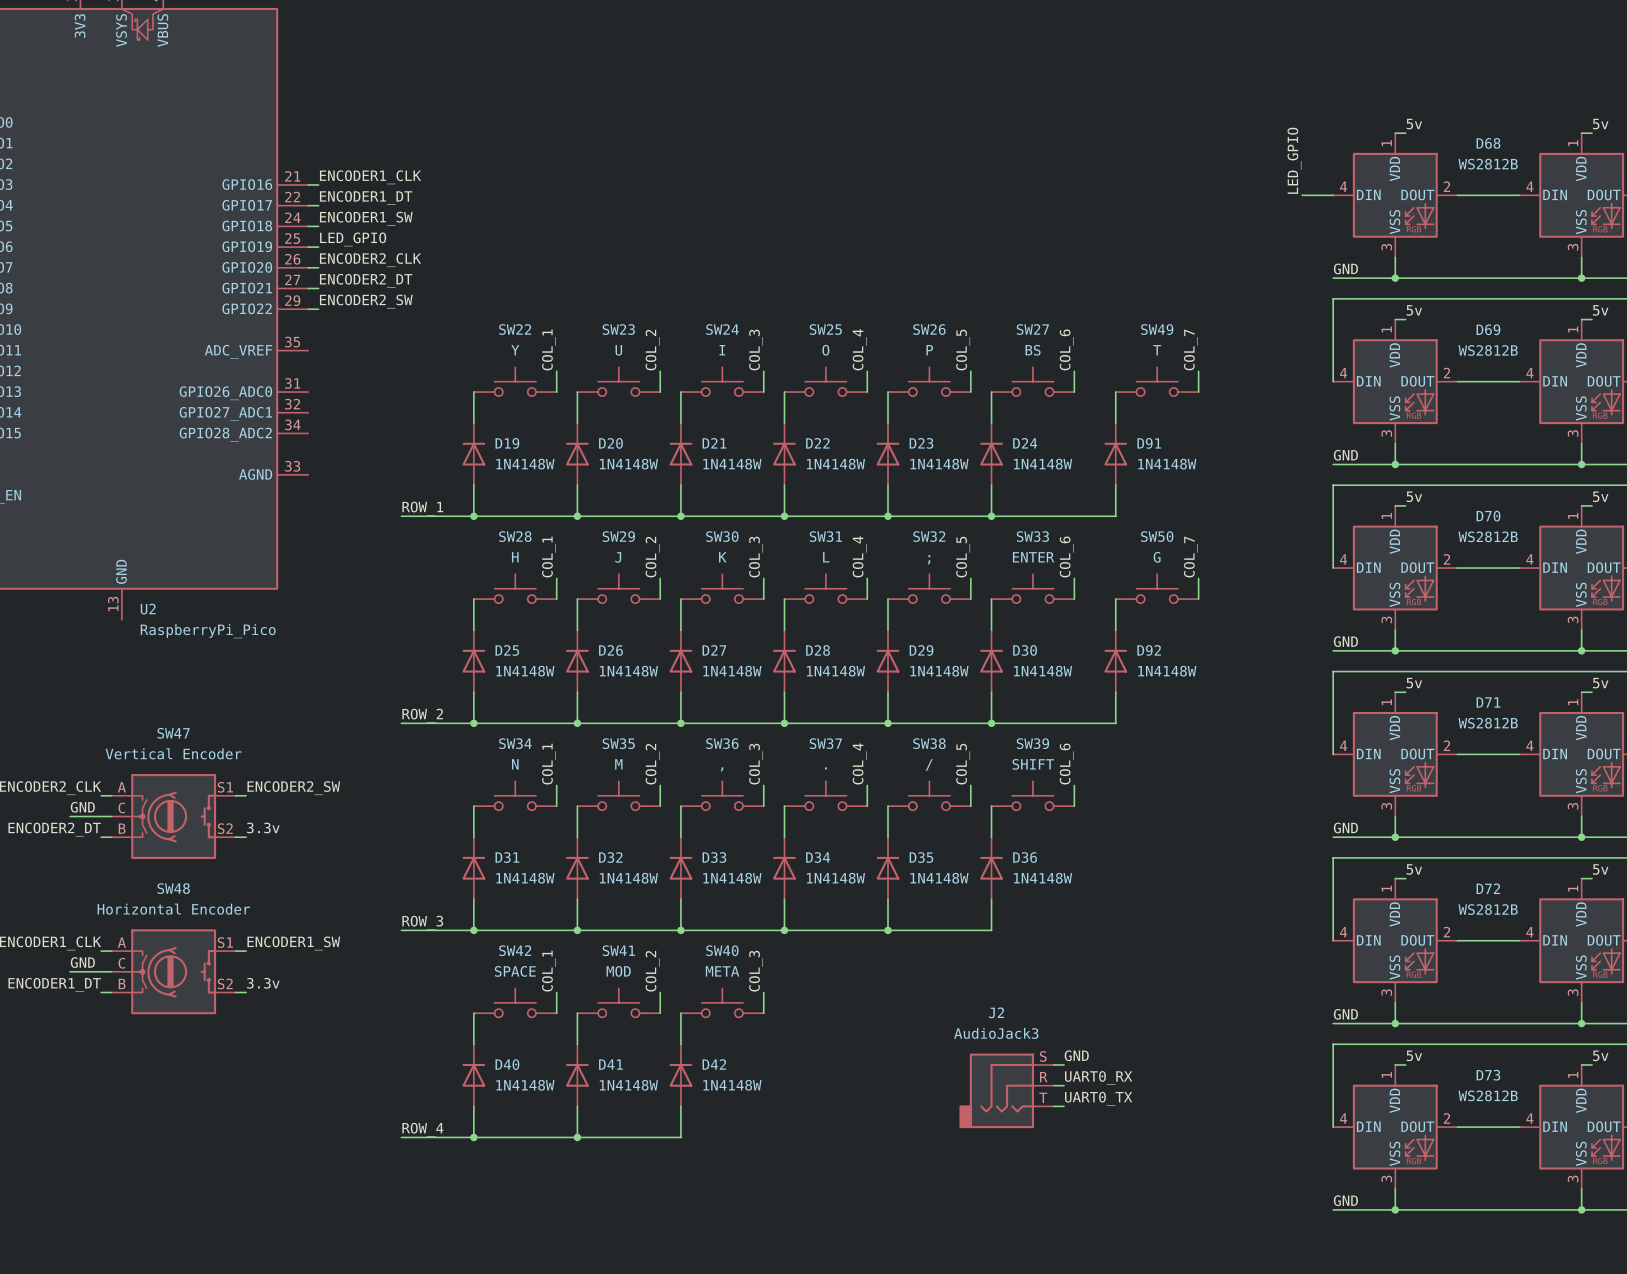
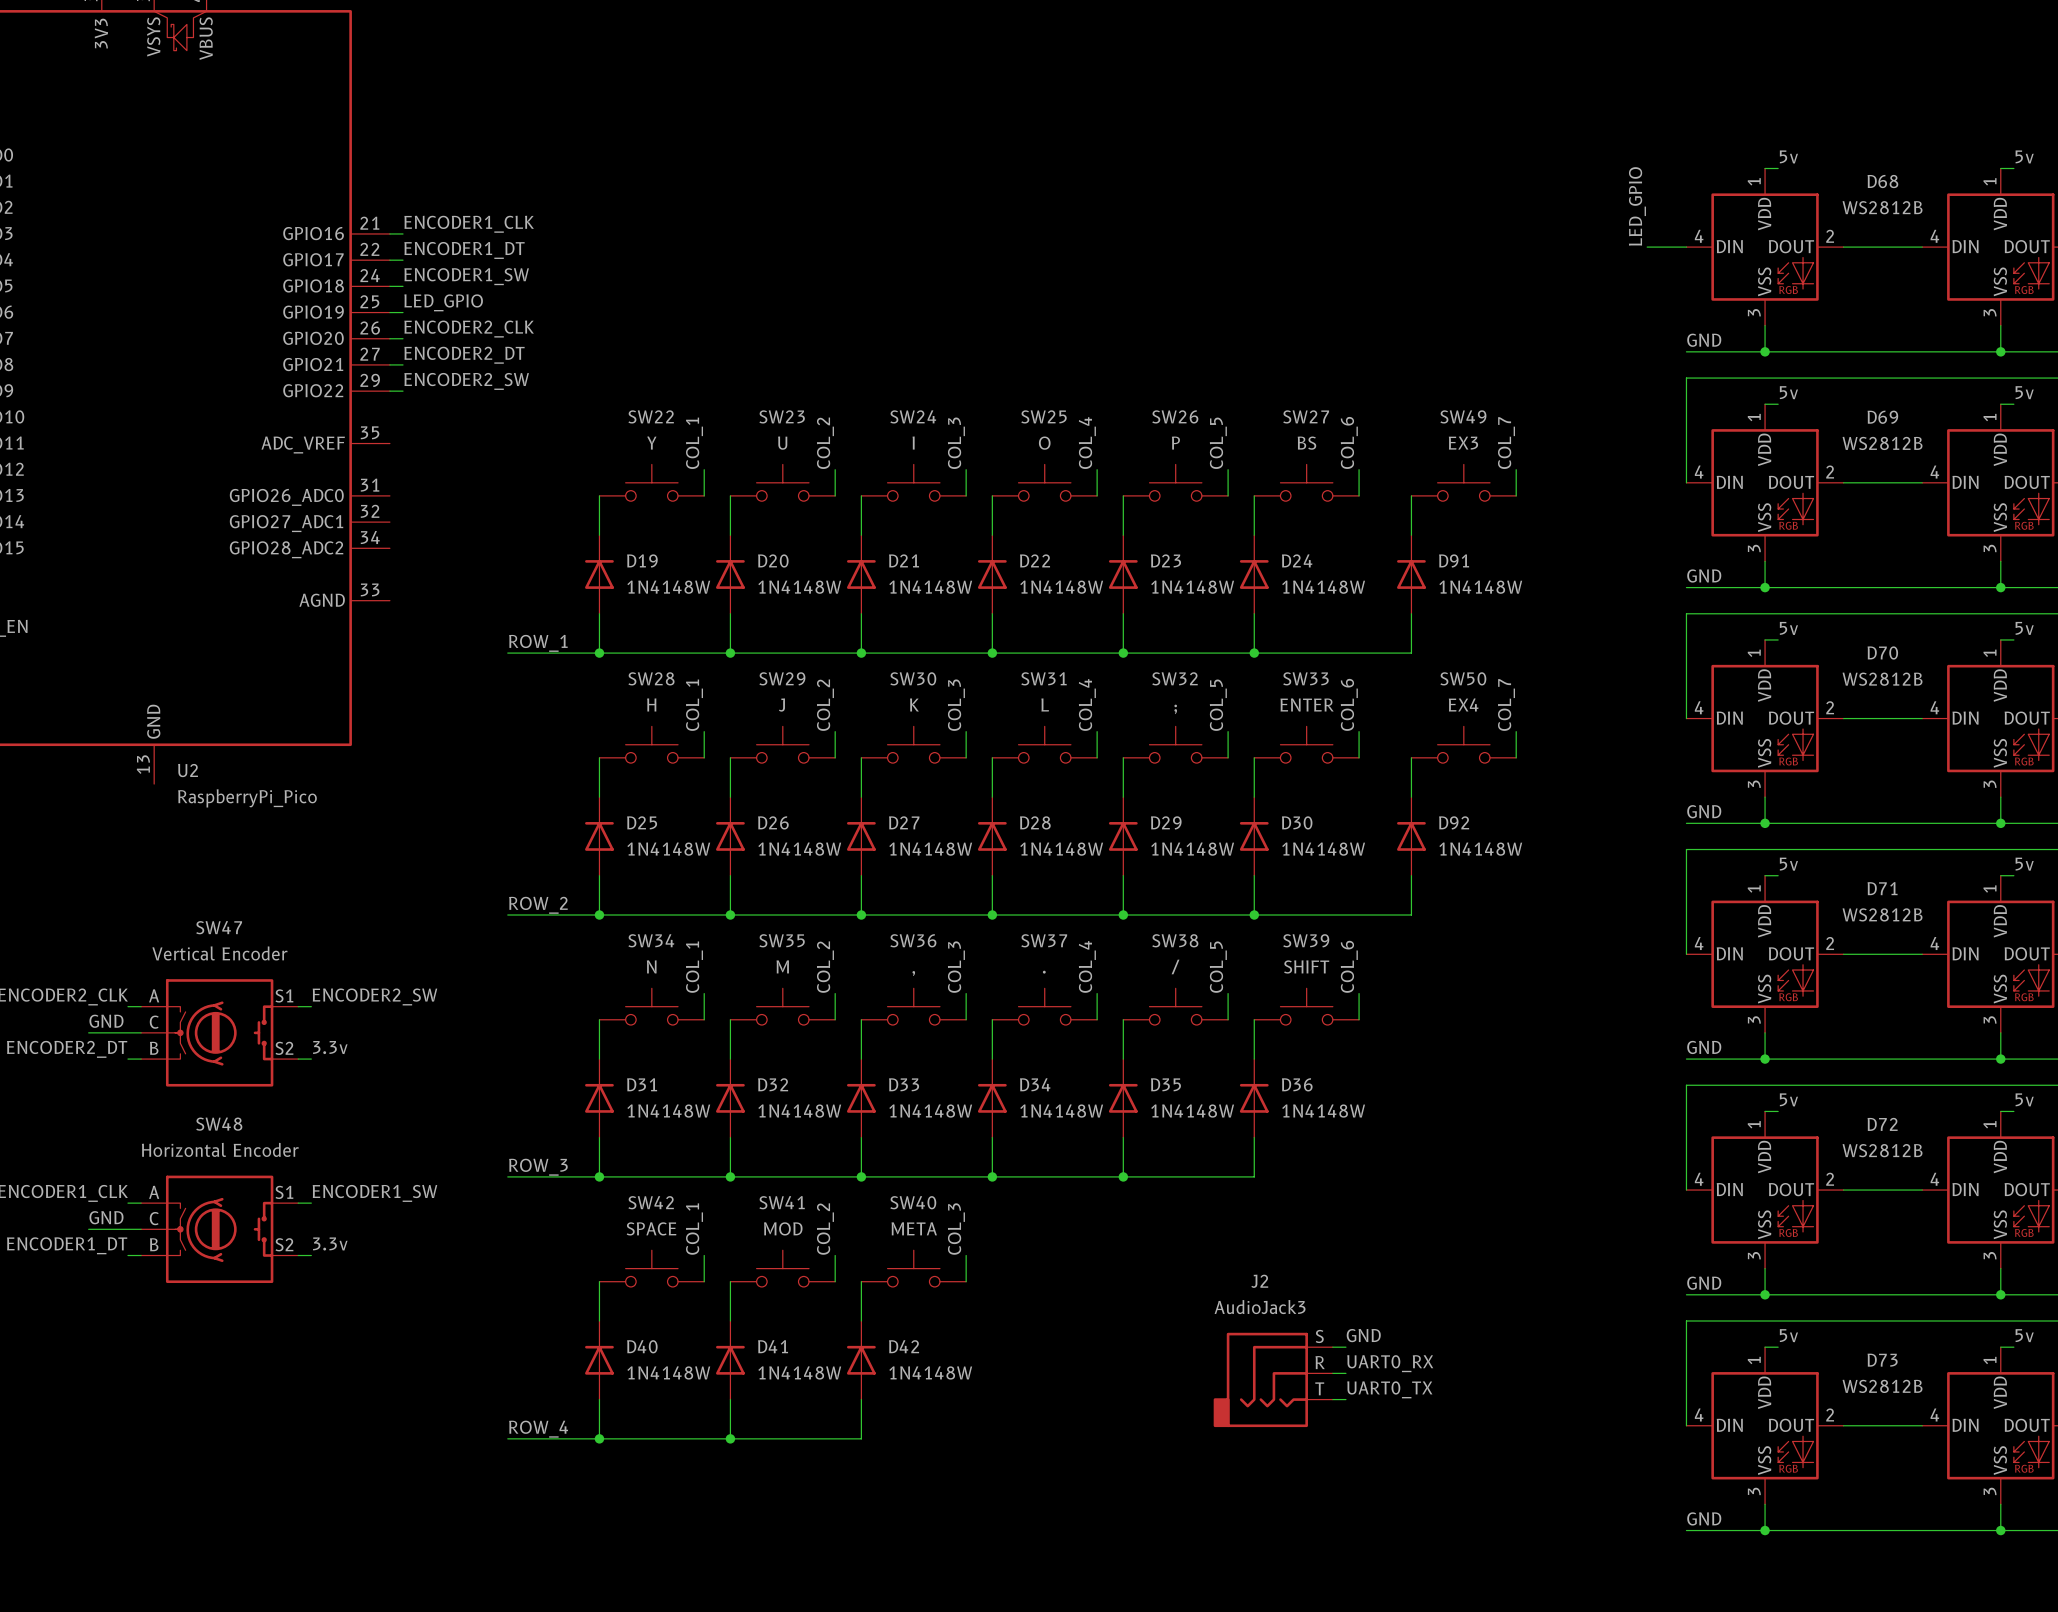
SW49 value: T (1157, 350) -> EX3 (1463, 443)
SW50 value: G (1157, 557) -> EX4 (1463, 704)

